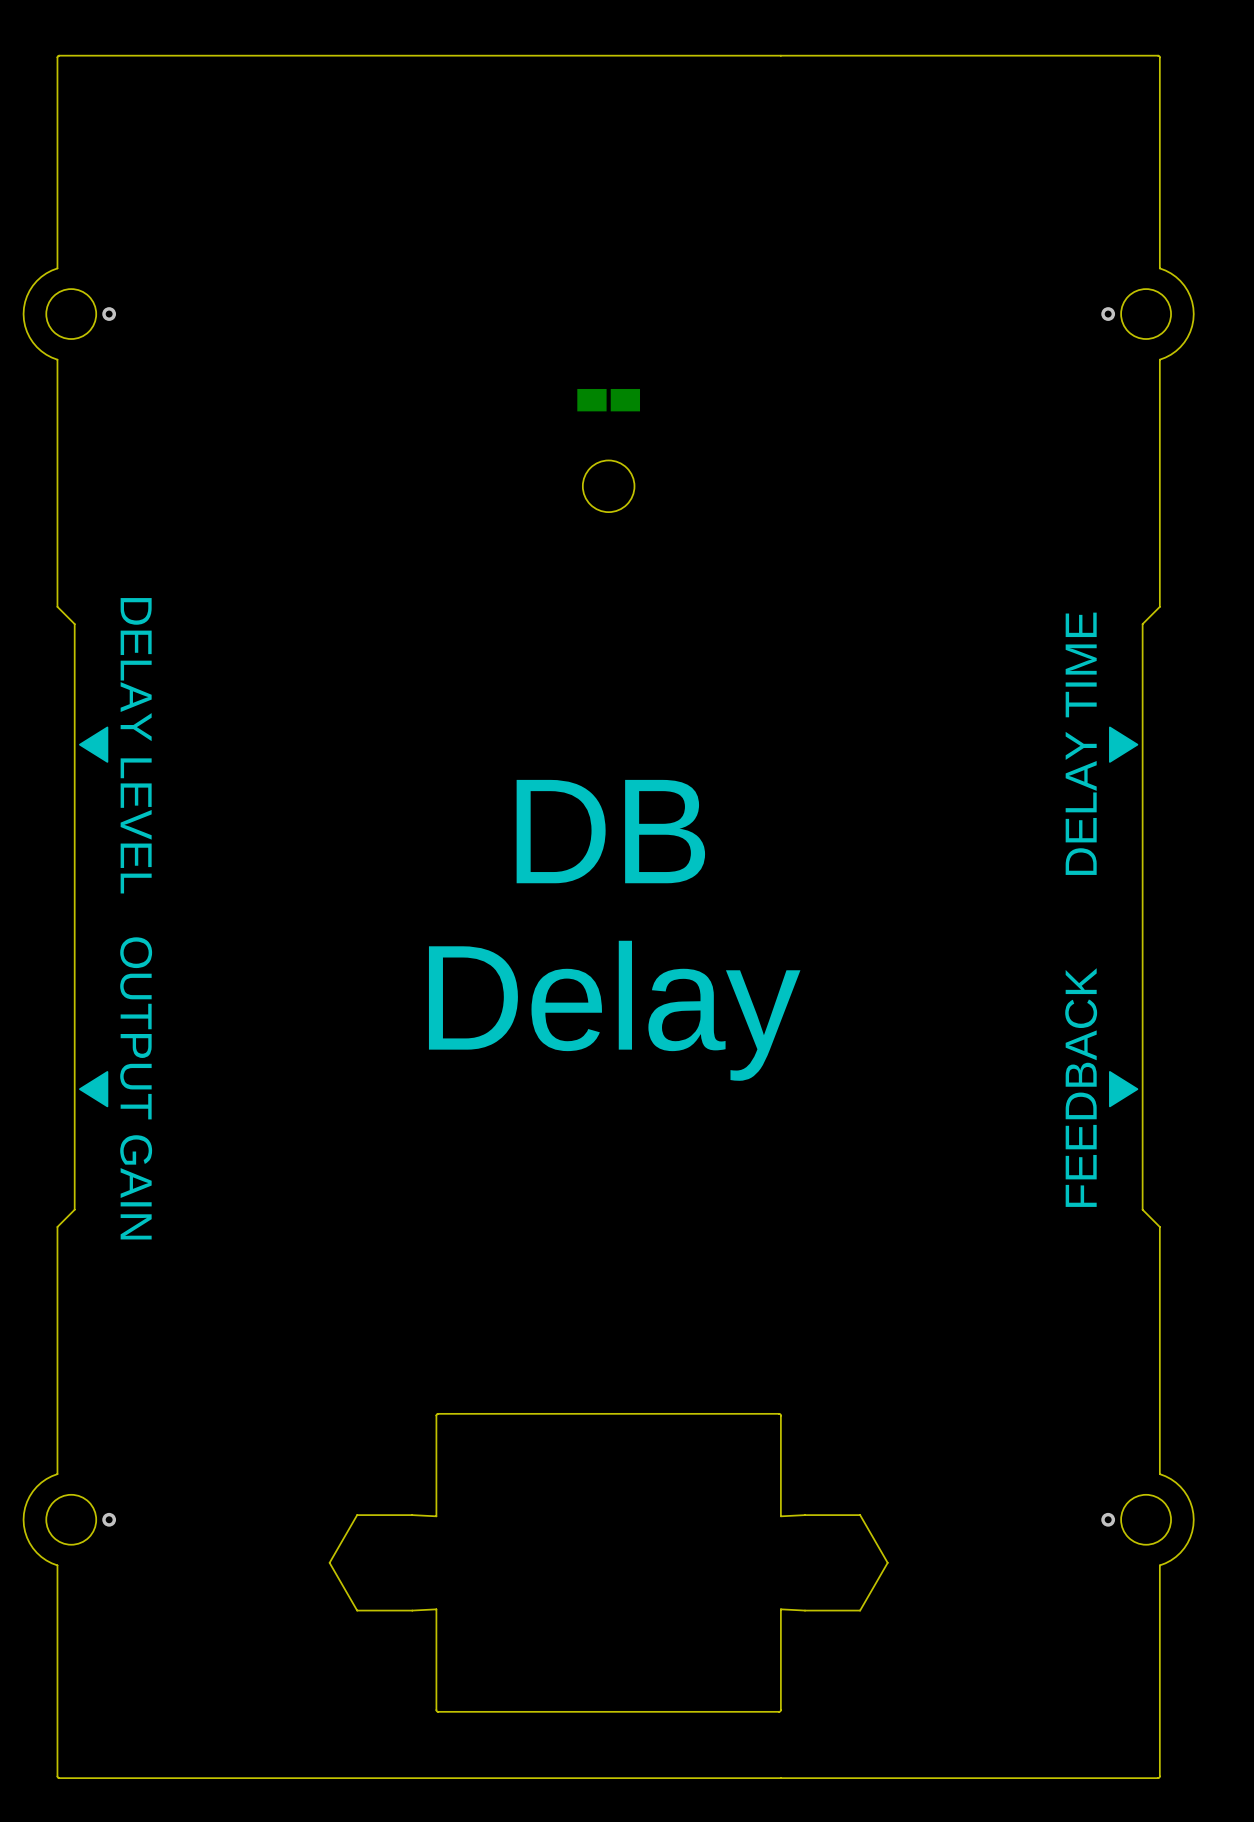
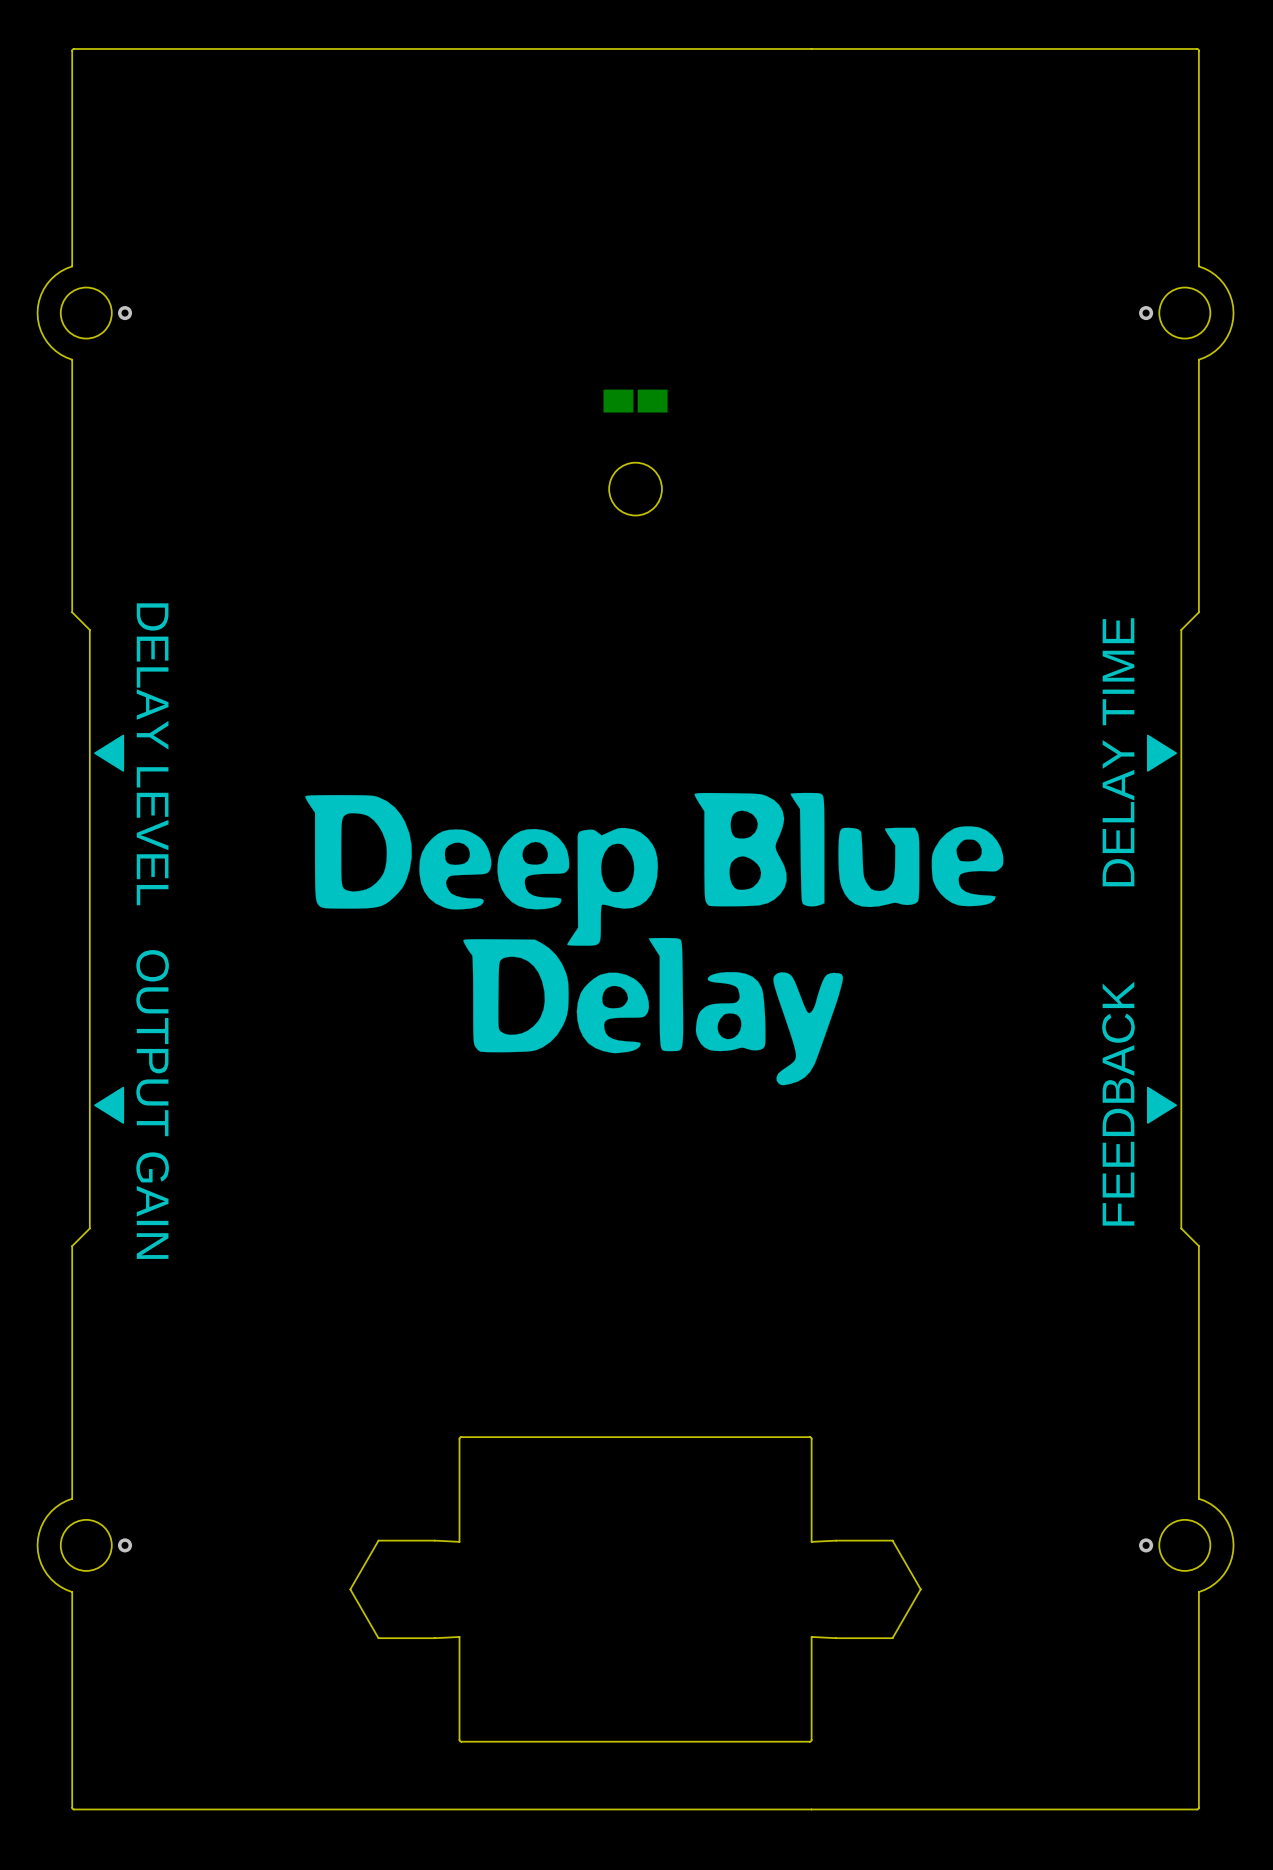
drawing: none -> [305, 792, 1004, 1086]
text: DB (610, 831) -> none
text: Delay (614, 1010) -> none

